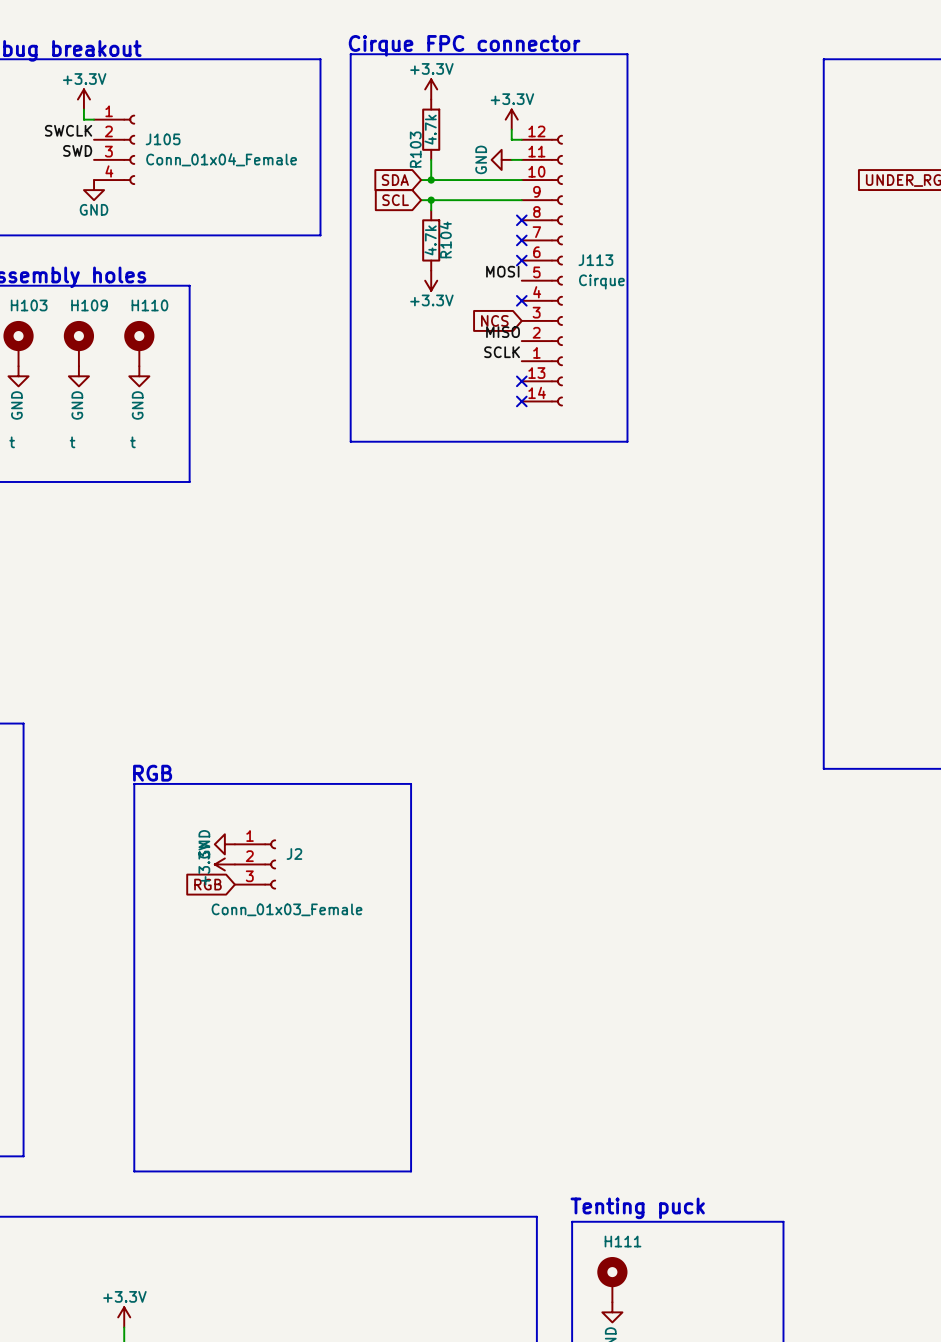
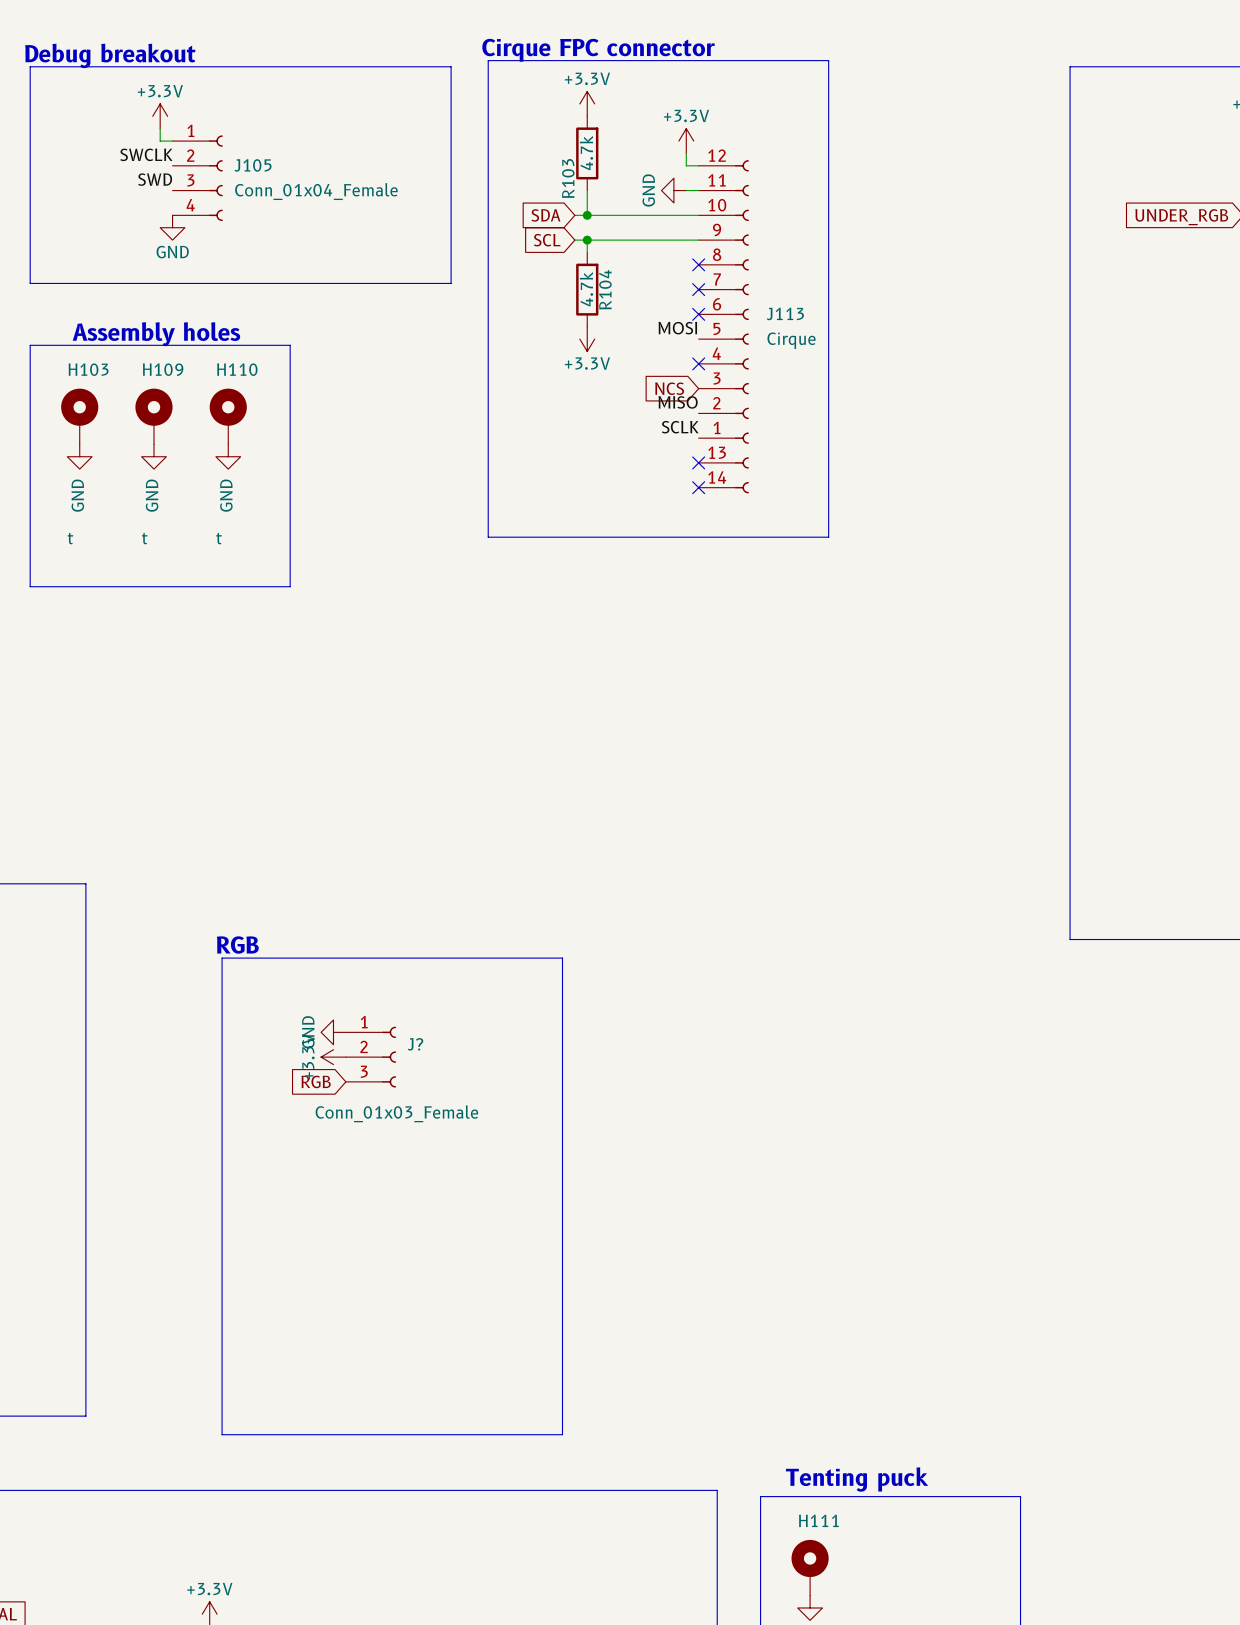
J2 name: J2 (294, 854) -> J? (415, 1044)

